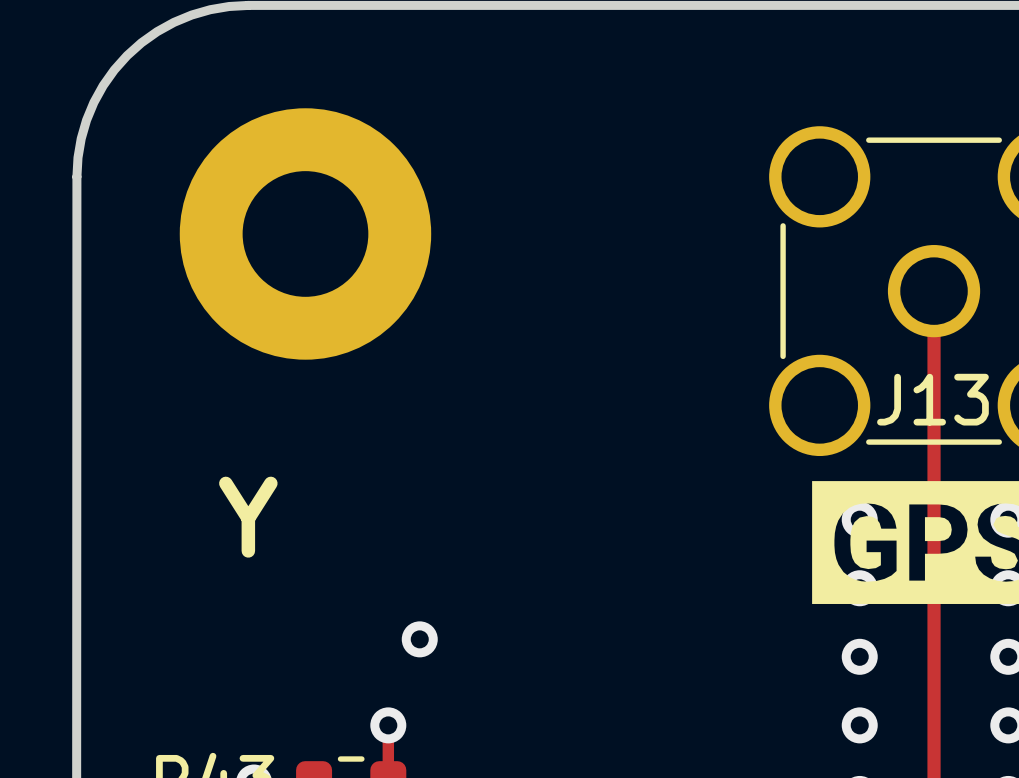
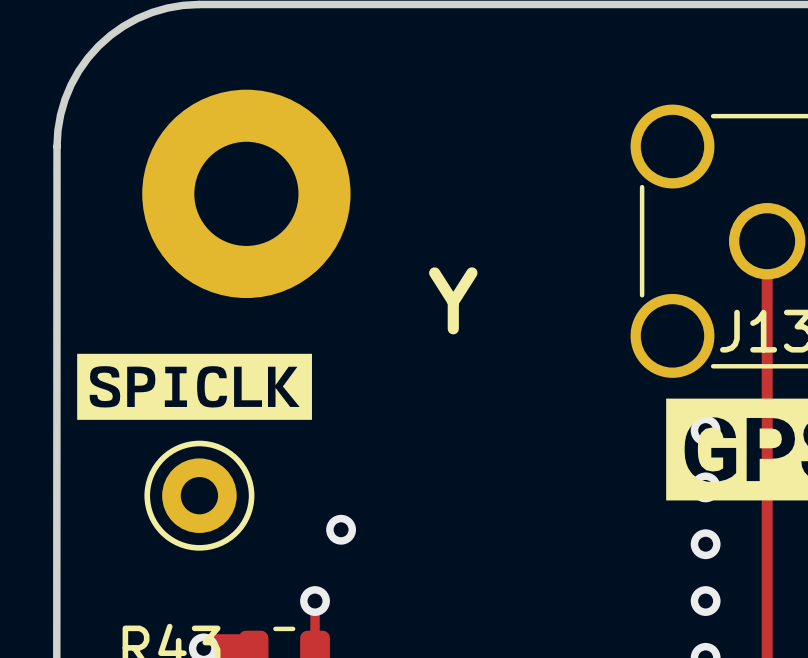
drawing: none -> [77, 353, 312, 420]
text position: Y (248, 517) -> Y (453, 300)
part: none -> (199, 495)

